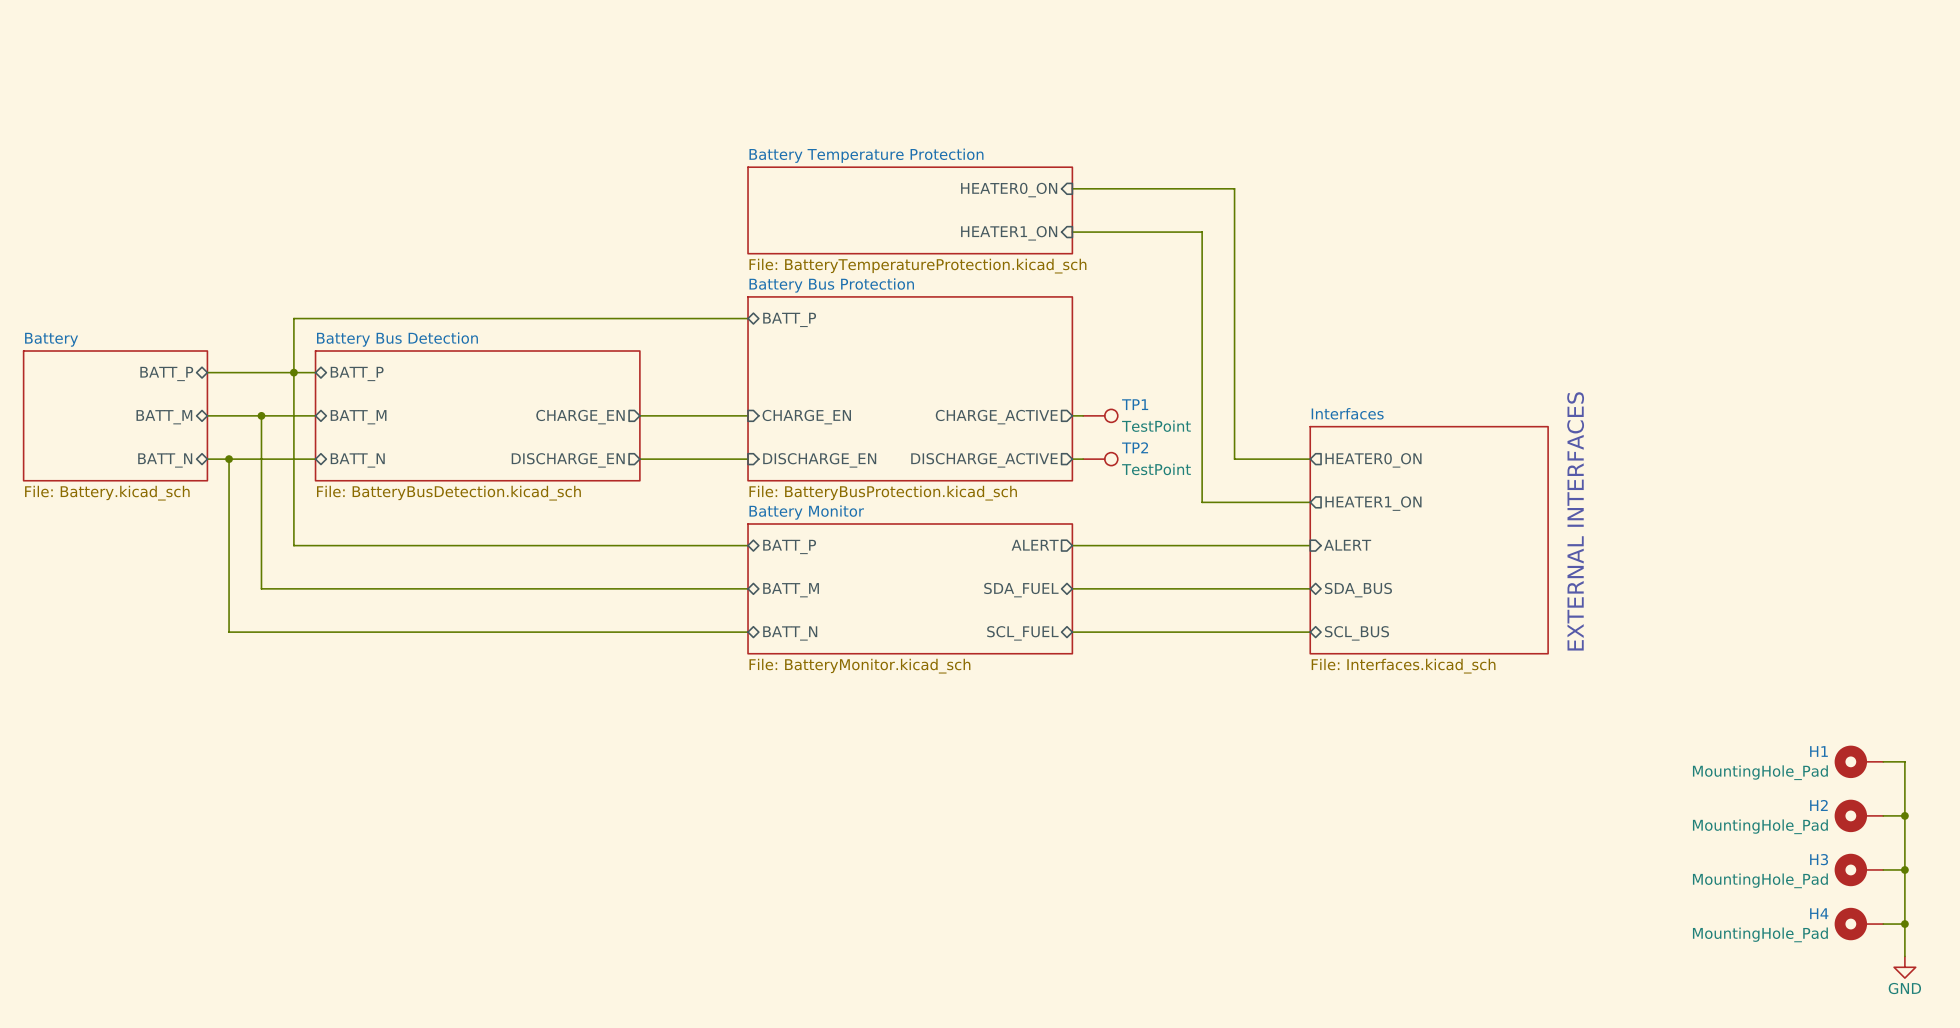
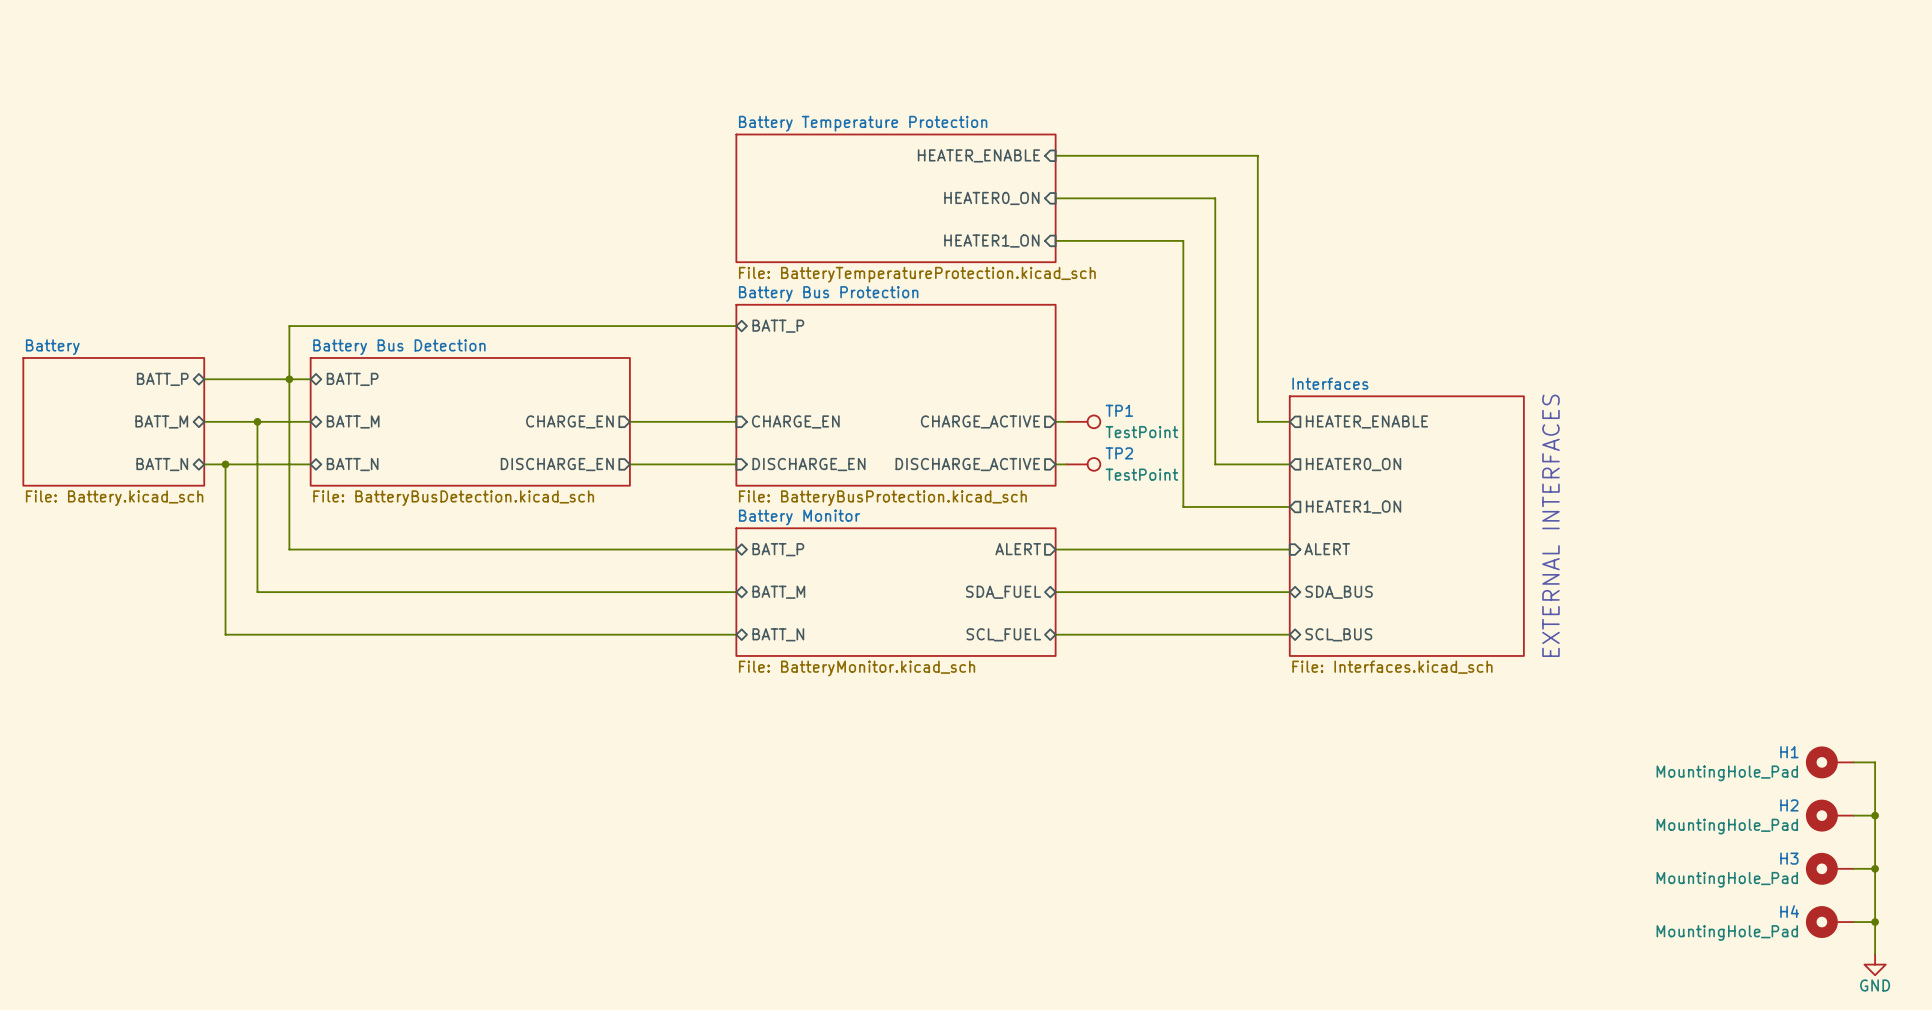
wire: none -> (1055, 155) (1257, 155) (1257, 421) (1289, 421)
sheet pin: none -> HEATER_ENABLE (978, 155)
sheet Battery Temperature Protection: none -> File: BatteryTemperatureProtection.kicad_sch (895, 198)
sheet Battery Temperature Protection: File: BatteryTemperatureProtection.kicad_sch (910, 210) -> none
sheet pin: none -> HEATER_ENABLE (1366, 421)
sheet Interfaces: none -> File: Interfaces.kicad_sch (1406, 526)
sheet Interfaces: File: Interfaces.kicad_sch (1429, 540) -> none

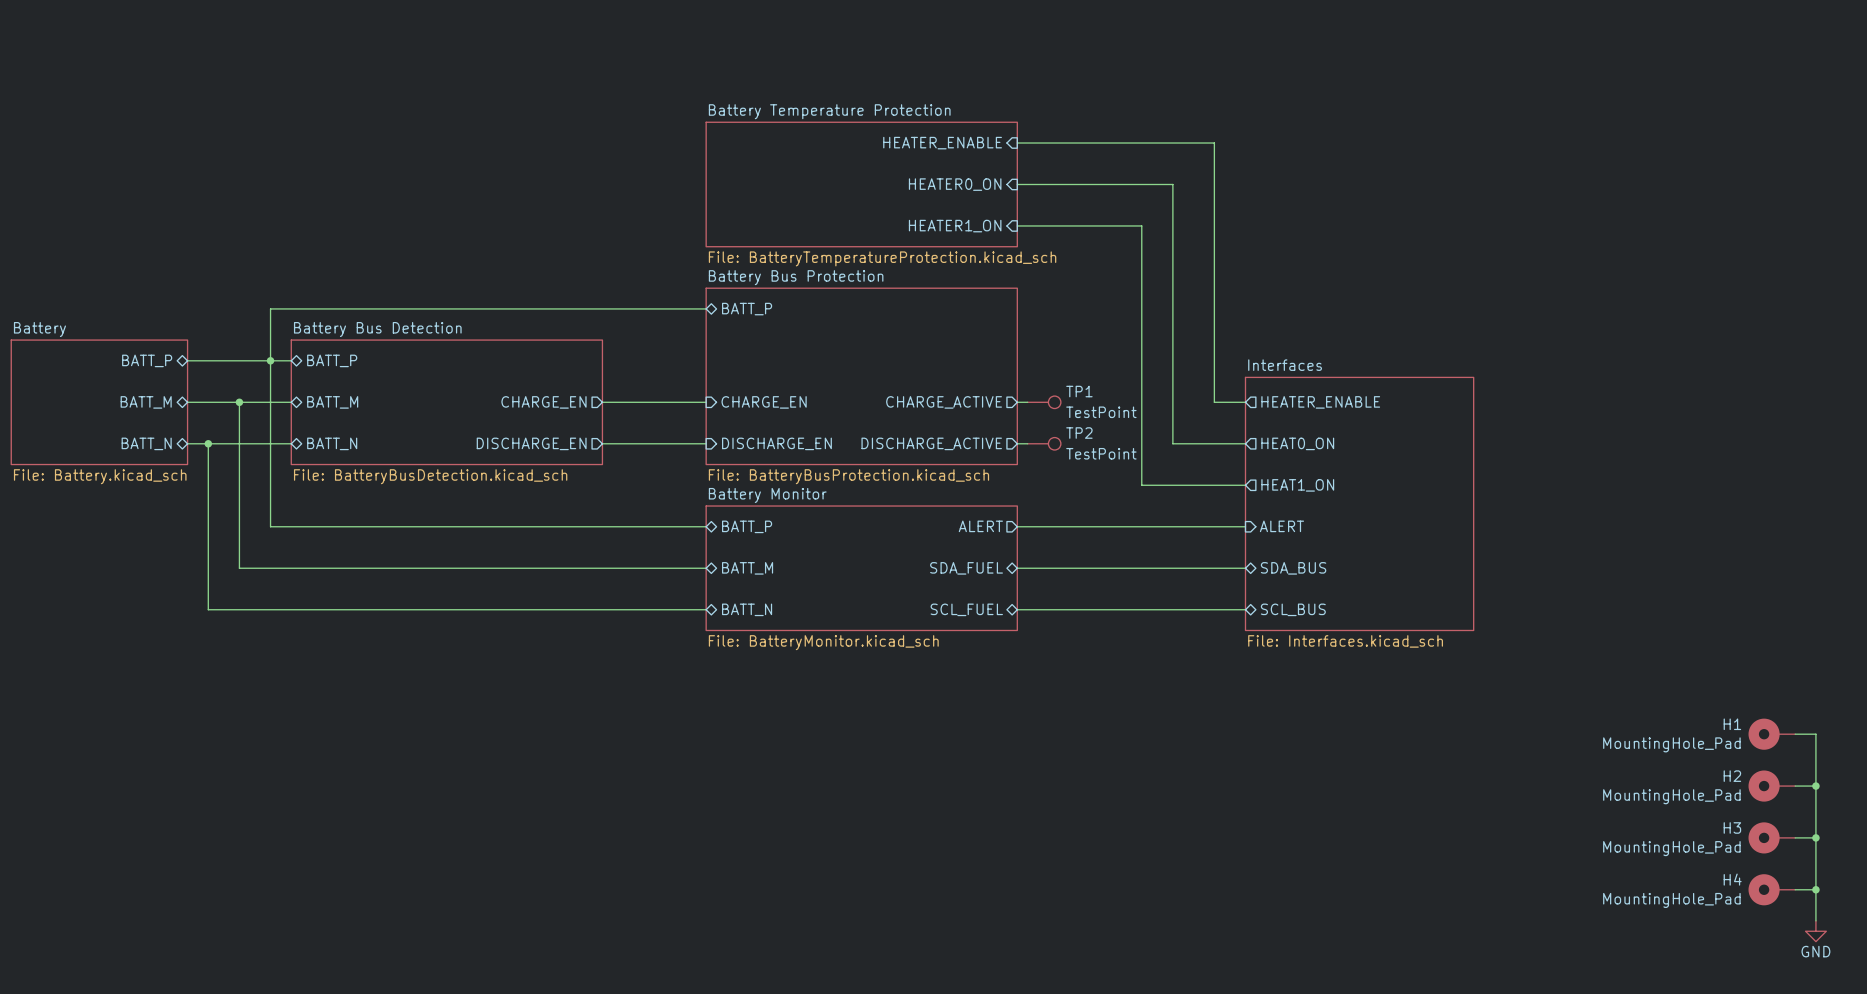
sheet pin: HEATER0_ON (1353, 464) -> HEAT0_ON (1297, 443)
sheet pin: HEATER1_ON (1353, 507) -> HEAT1_ON (1297, 485)
text: EXTERNAL INTERFACES (1550, 525) -> none

